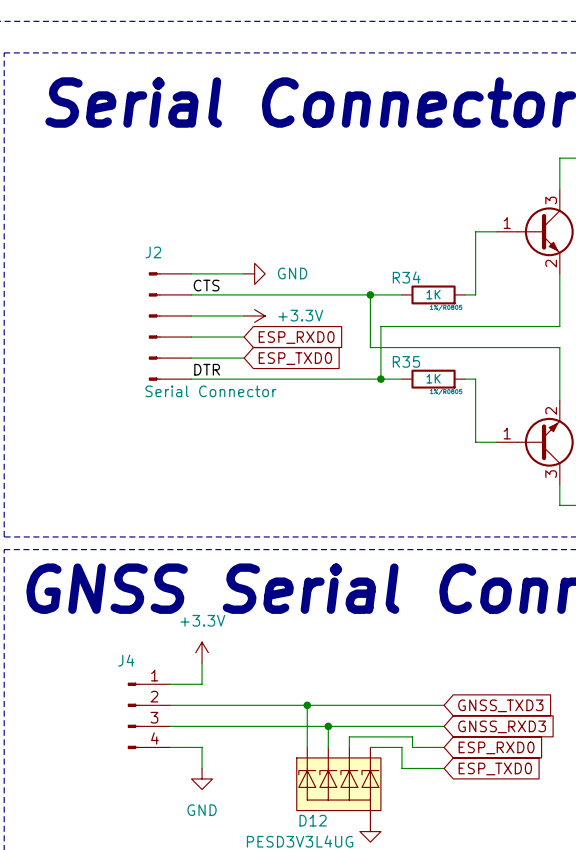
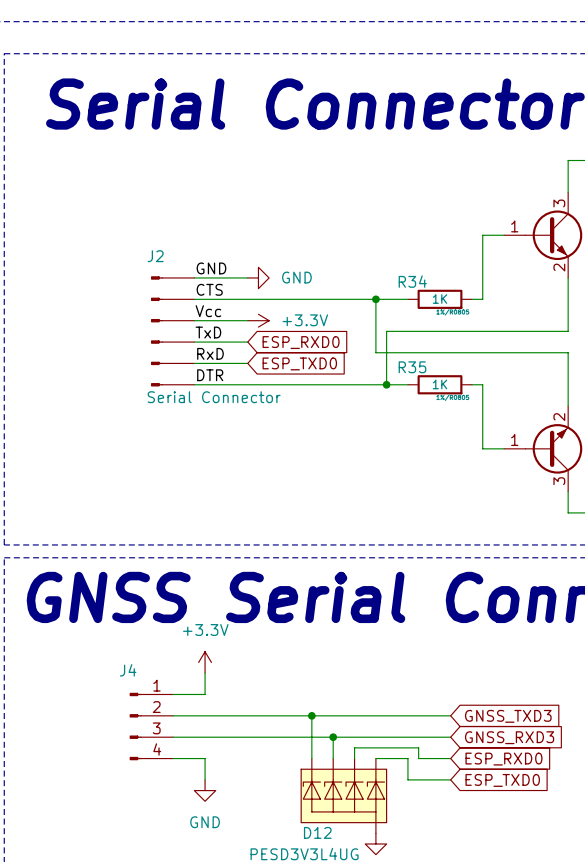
label: none -> GND (211, 268)
label: none -> Vcc (208, 311)
label: none -> TxD (208, 332)
label: none -> RxD (210, 353)

